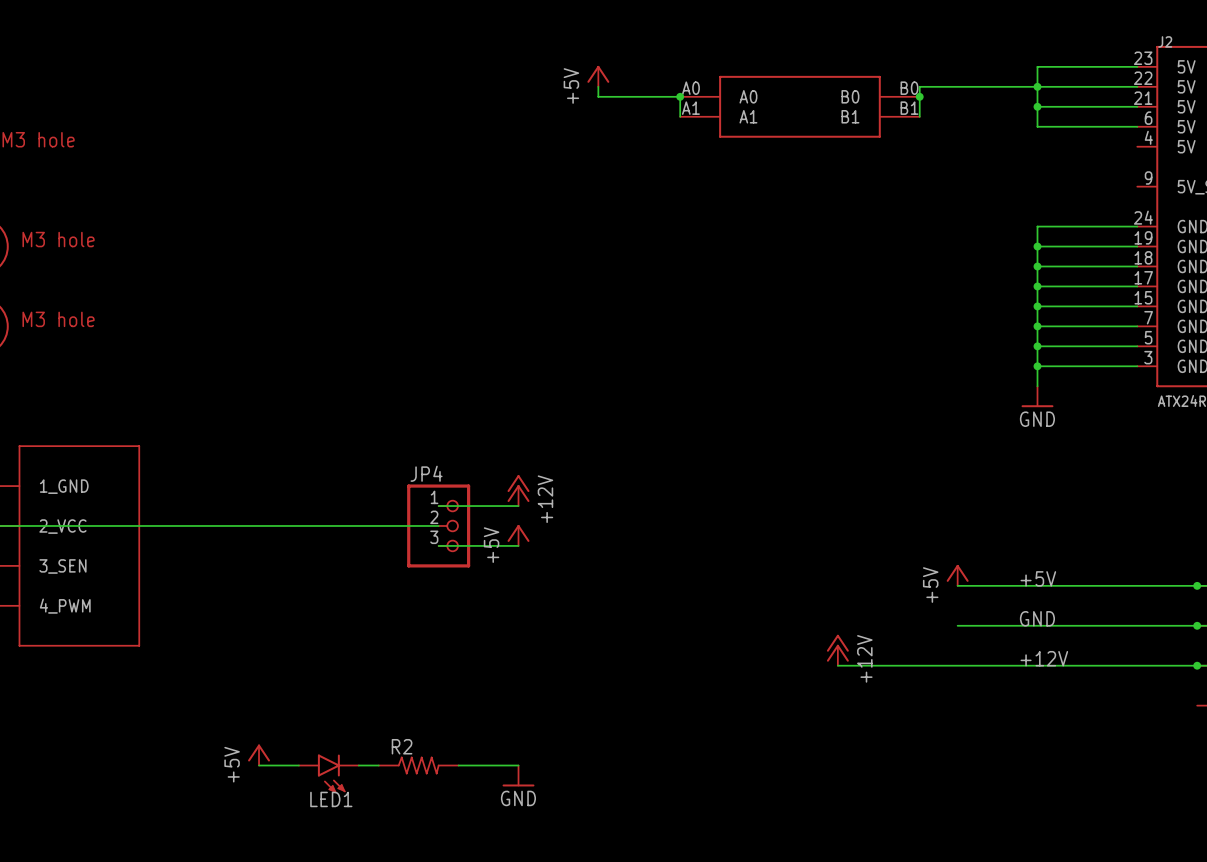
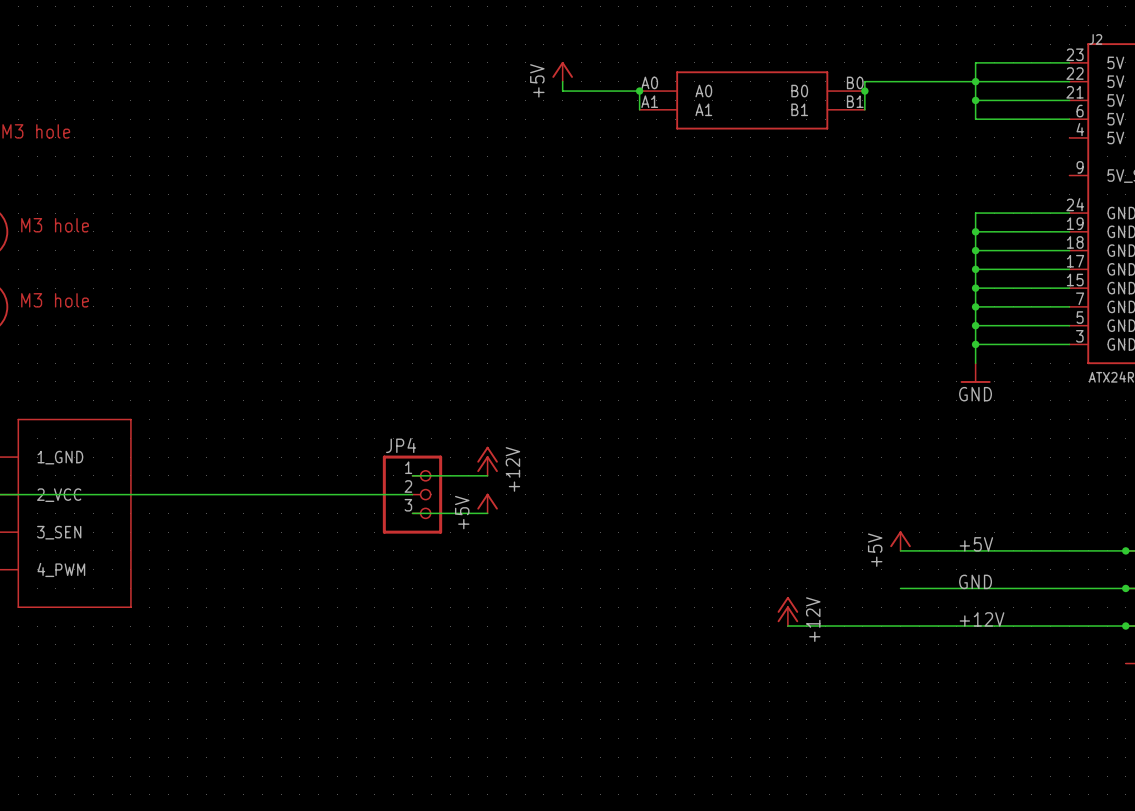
power symbol: +5V (259, 755) -> none
wire: (259, 765) (298, 765) -> none
wire: (358, 765) (378, 765) -> none
R2: (418, 765) -> none
wire: (458, 765) (518, 765) -> none
LED1: (328, 773) -> none
power symbol: GND (518, 775) -> none

